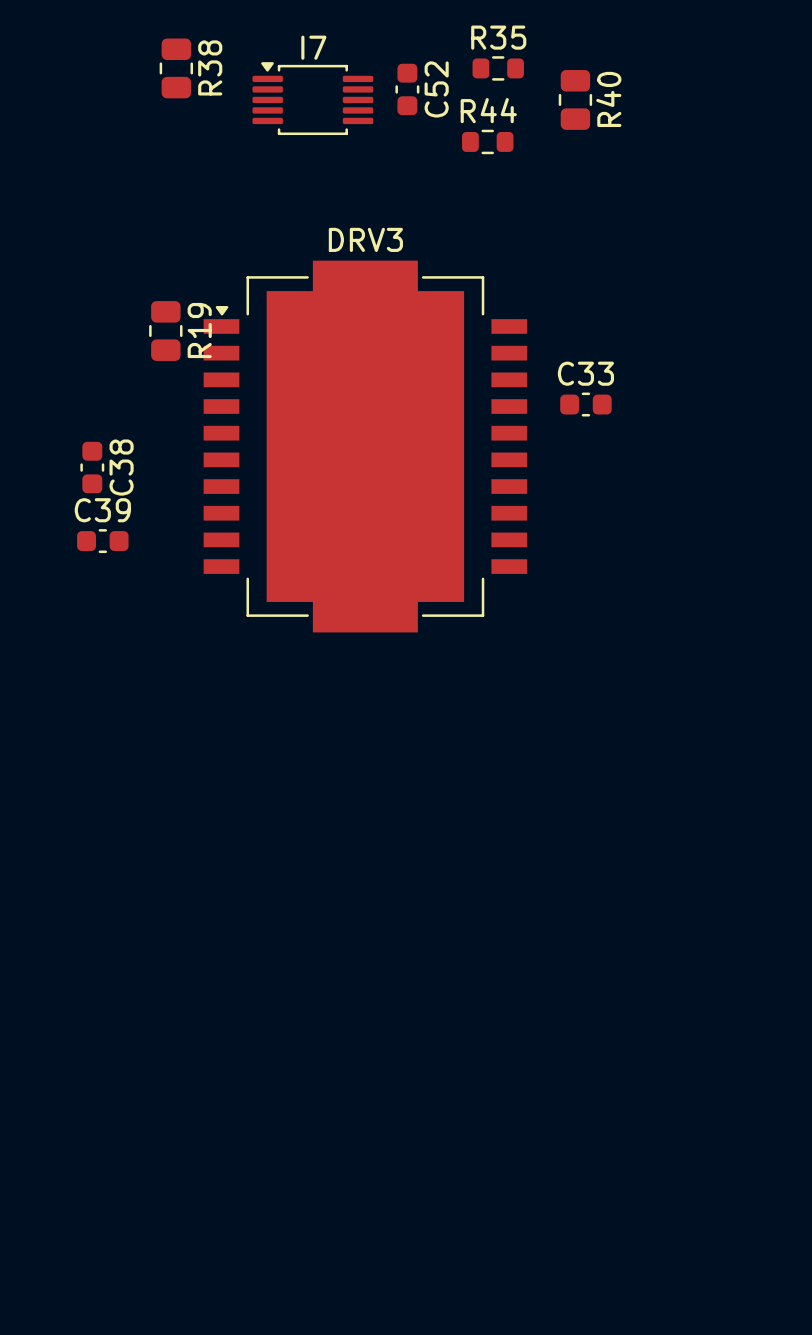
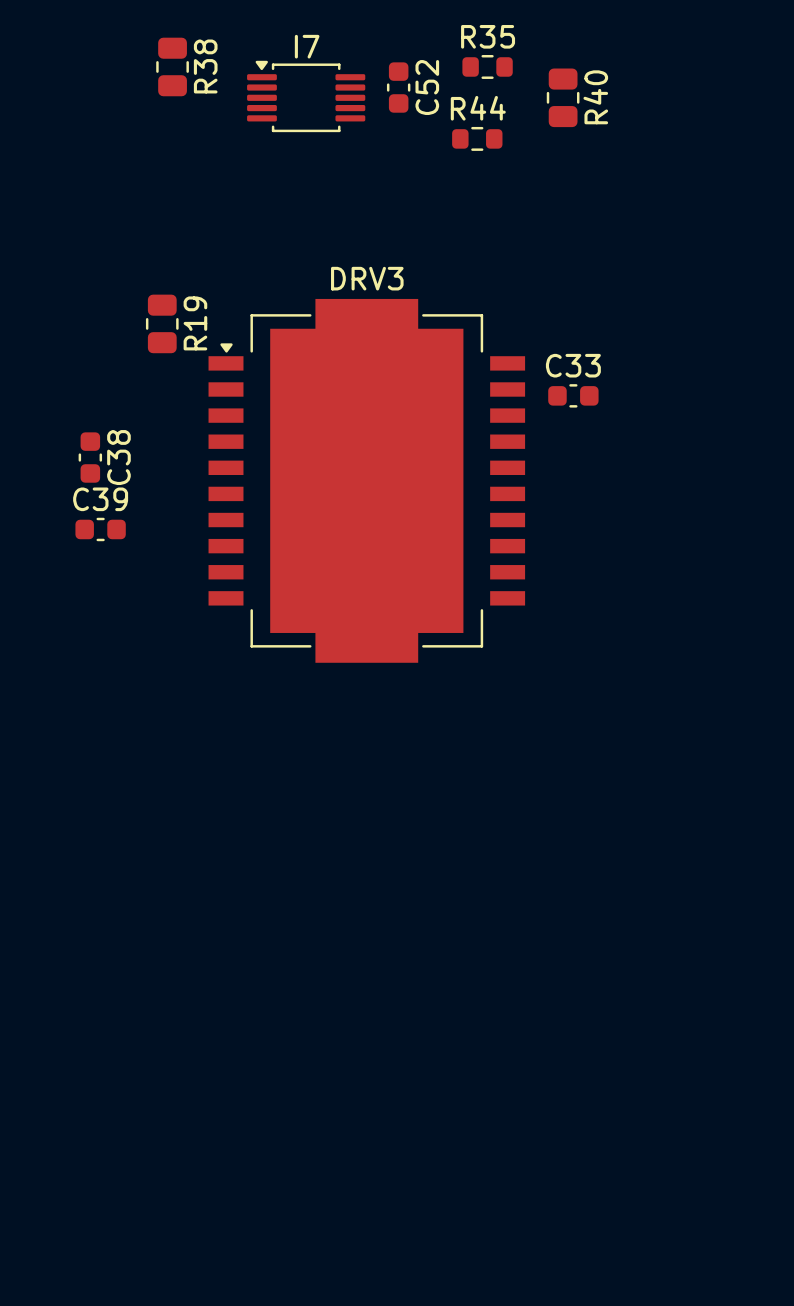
DRV3 position: (365, 446) -> (366, 480)

